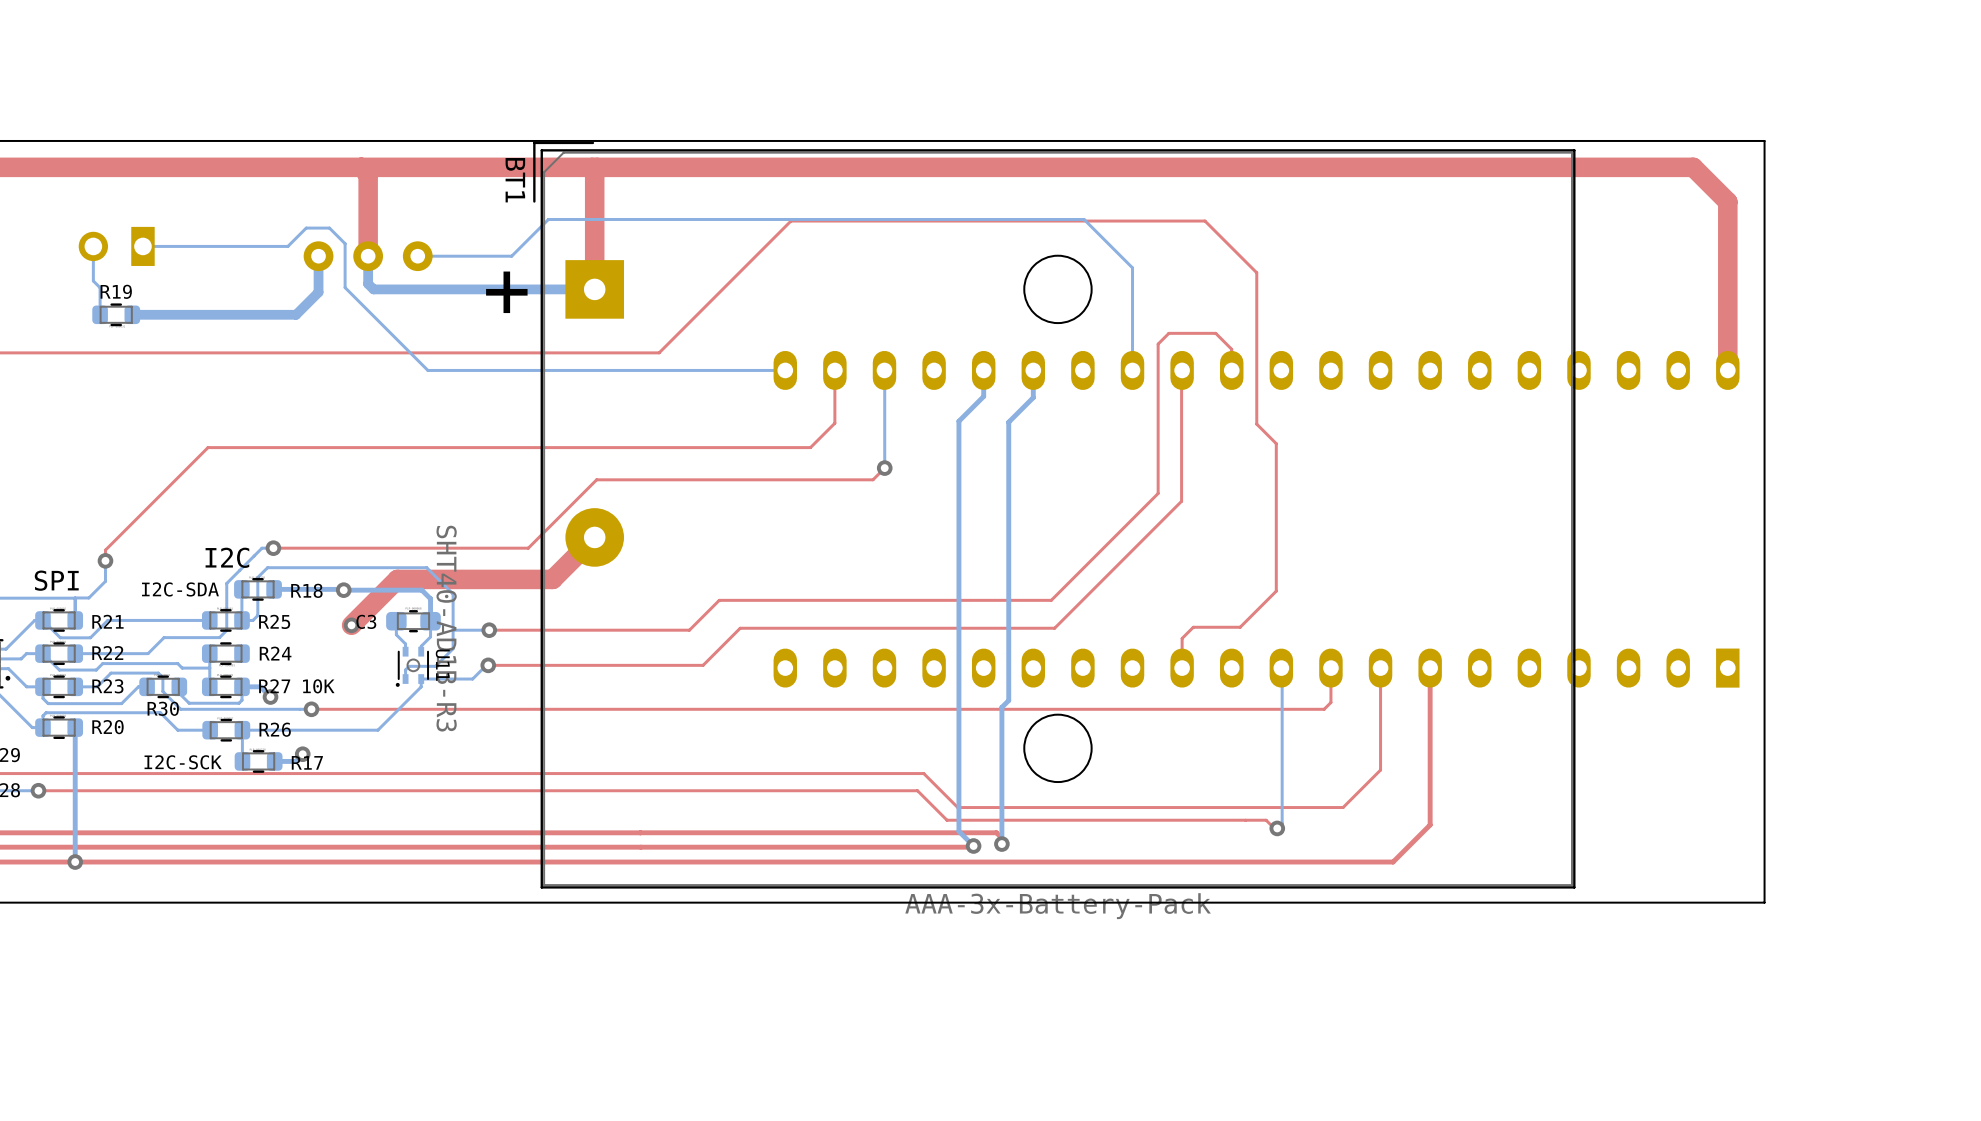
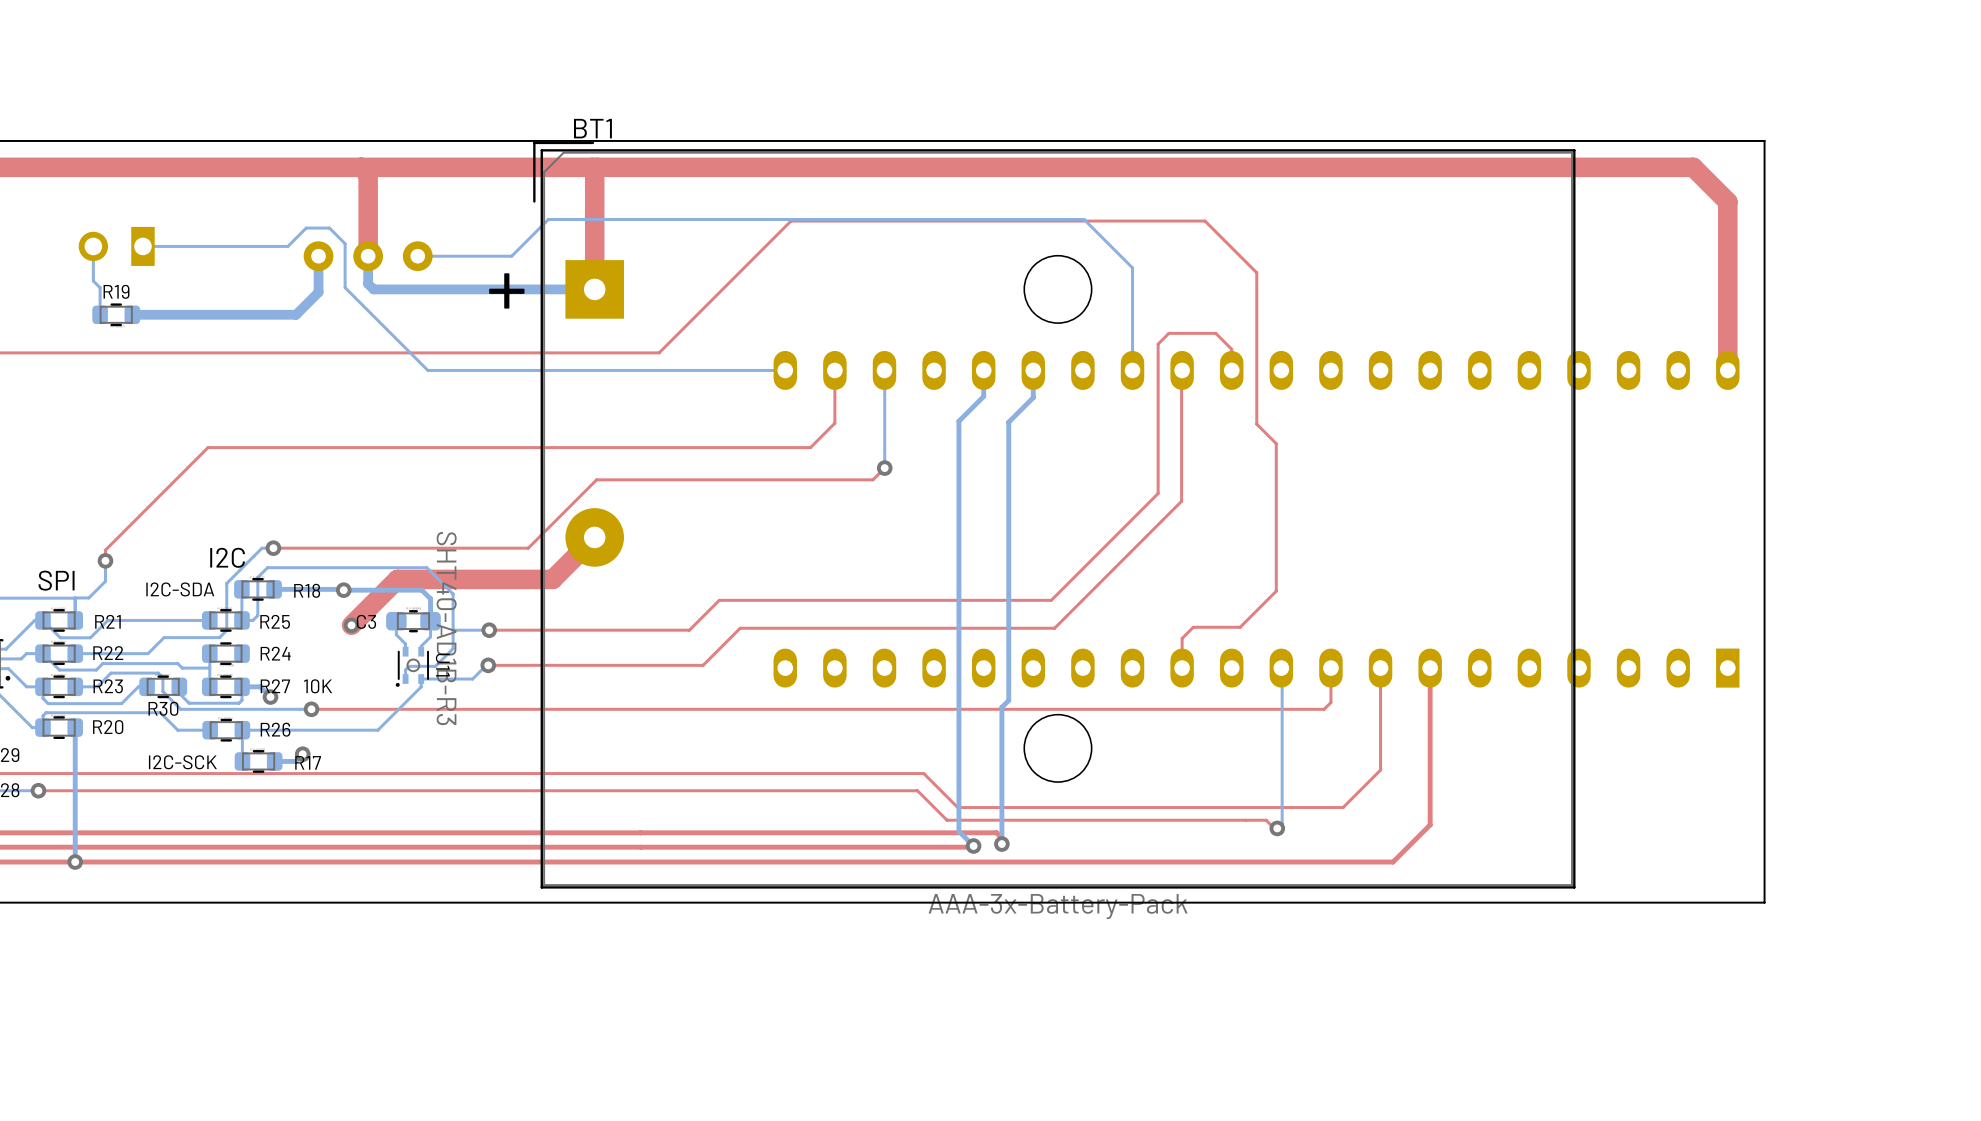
BT1 name rotation: 0° (515, 180) -> 90° counterclockwise (592, 128)
BT1 name position: BT1 (515, 180) -> BT1 (592, 128)

